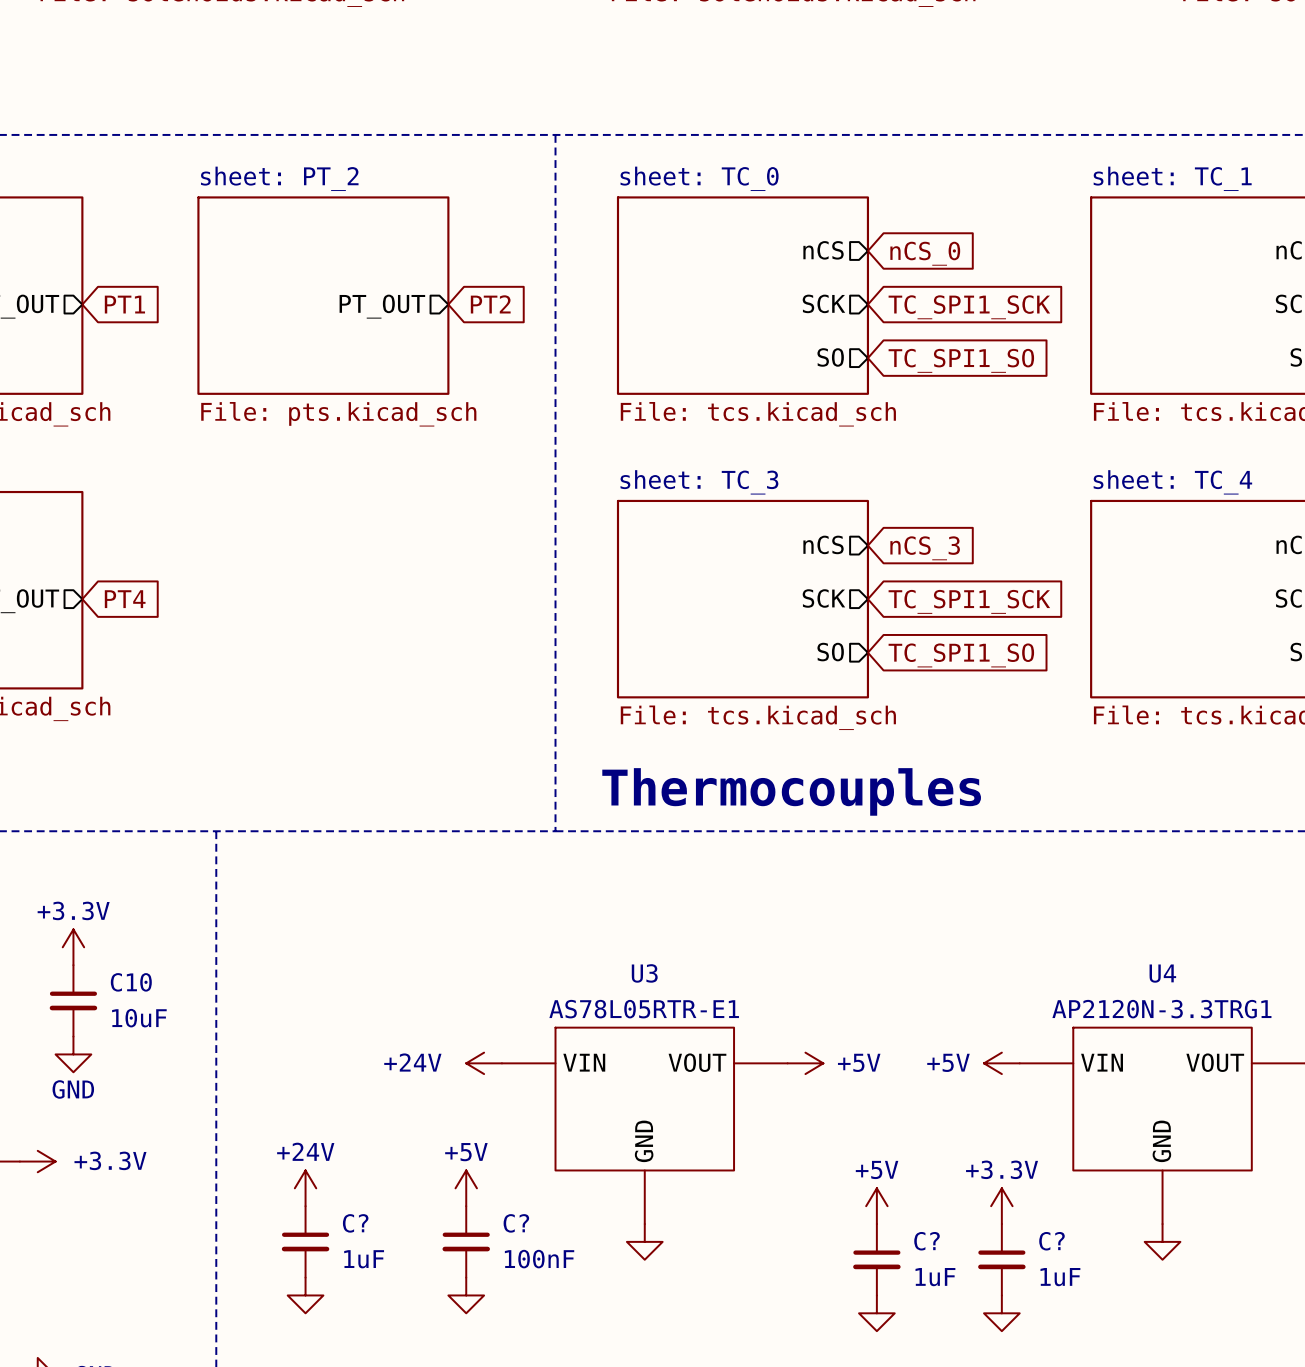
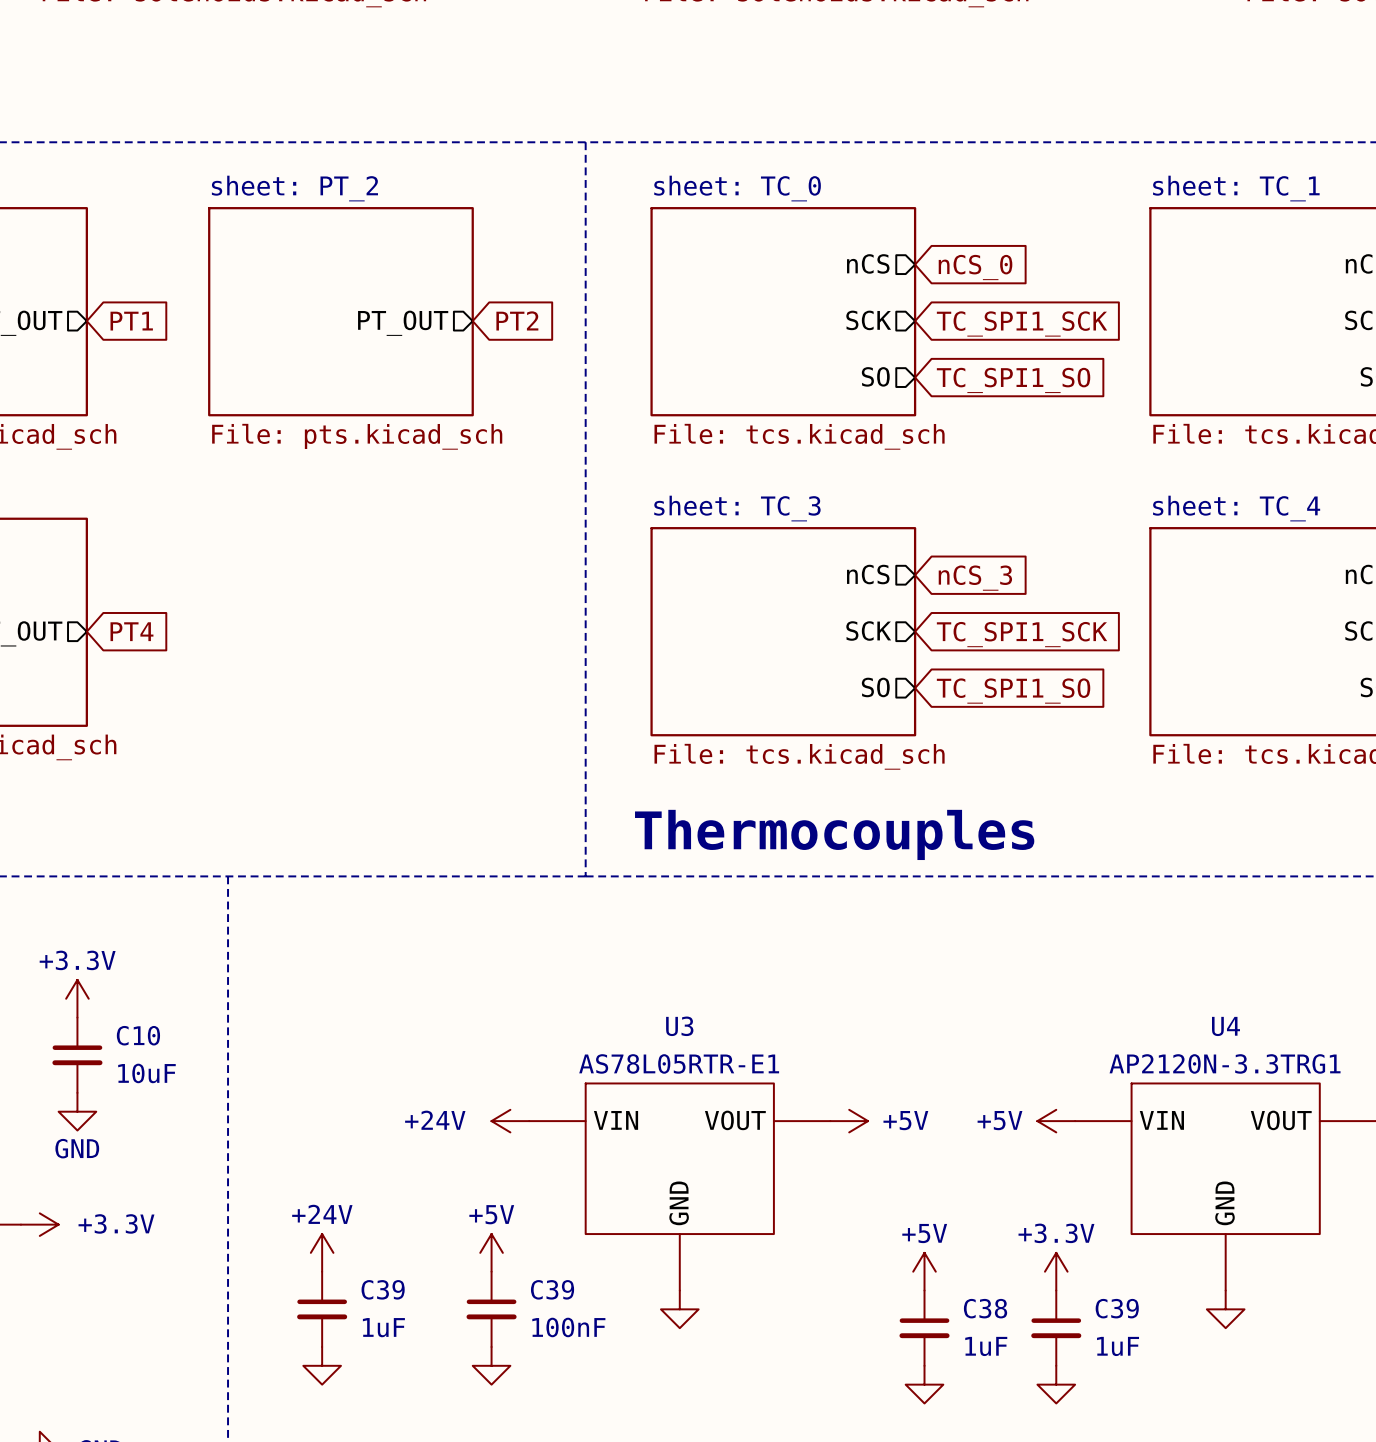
C? name: C? (355, 1223) -> C39 (383, 1289)
C? name: C? (516, 1223) -> C39 (552, 1289)
C? name: C? (927, 1241) -> C38 (985, 1308)
C? name: C? (1051, 1241) -> C39 (1117, 1308)

